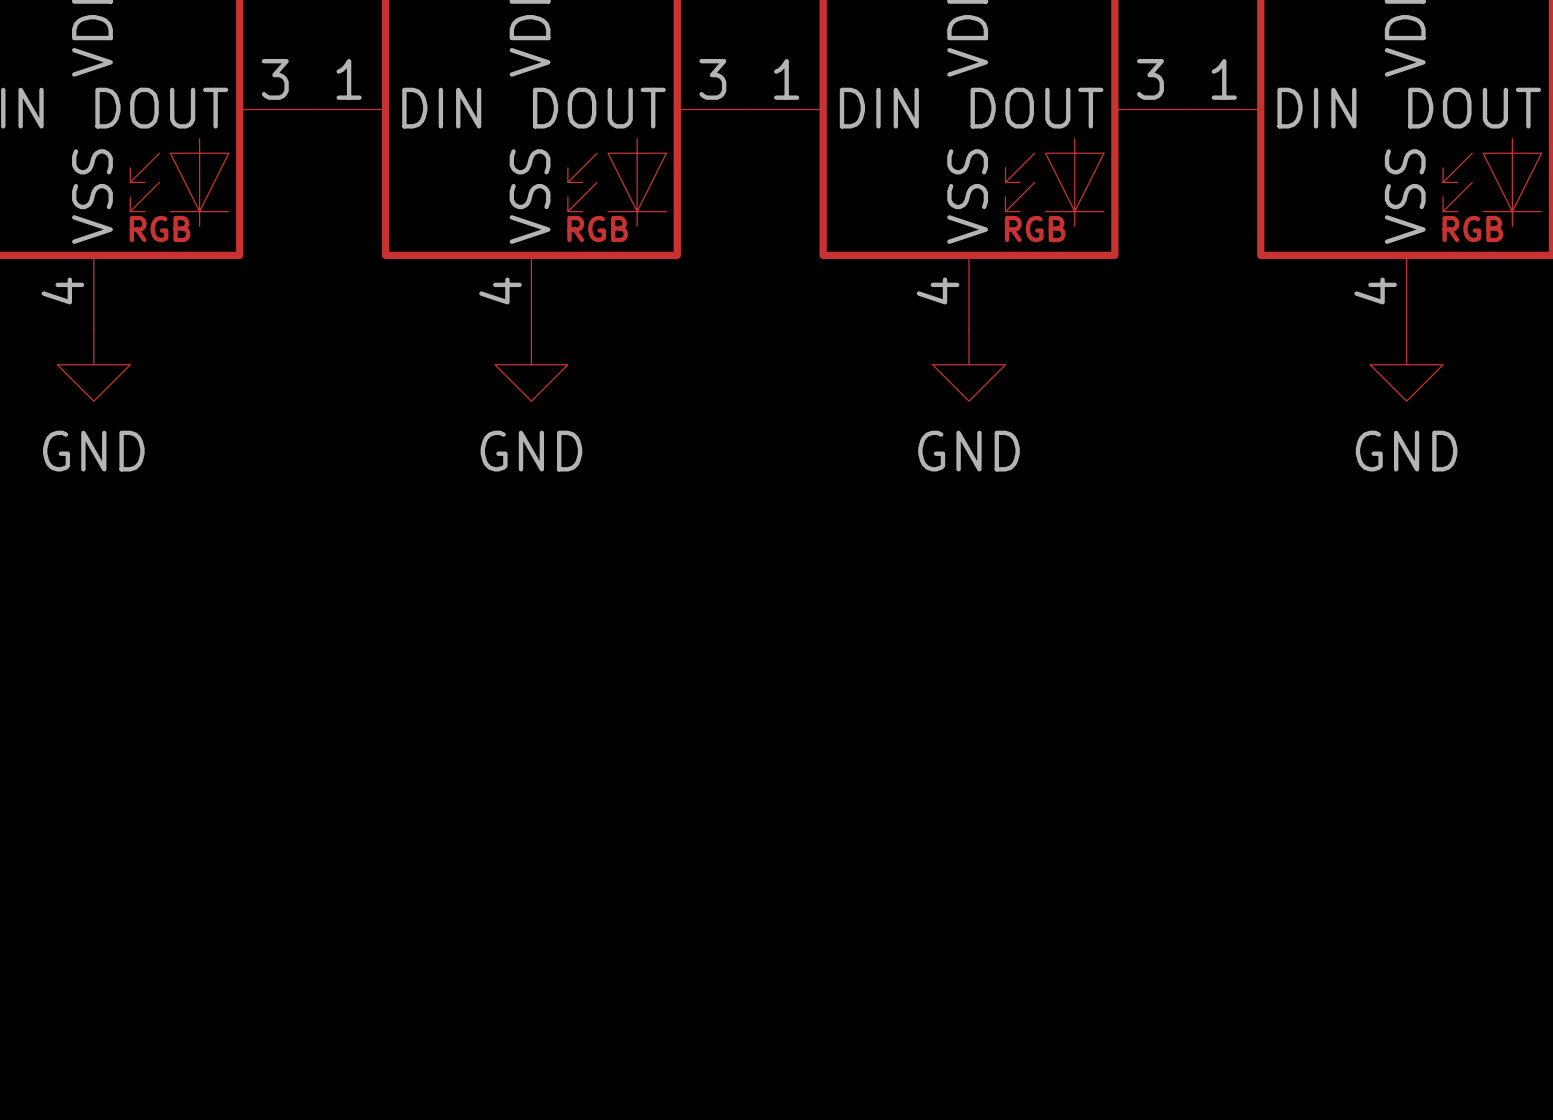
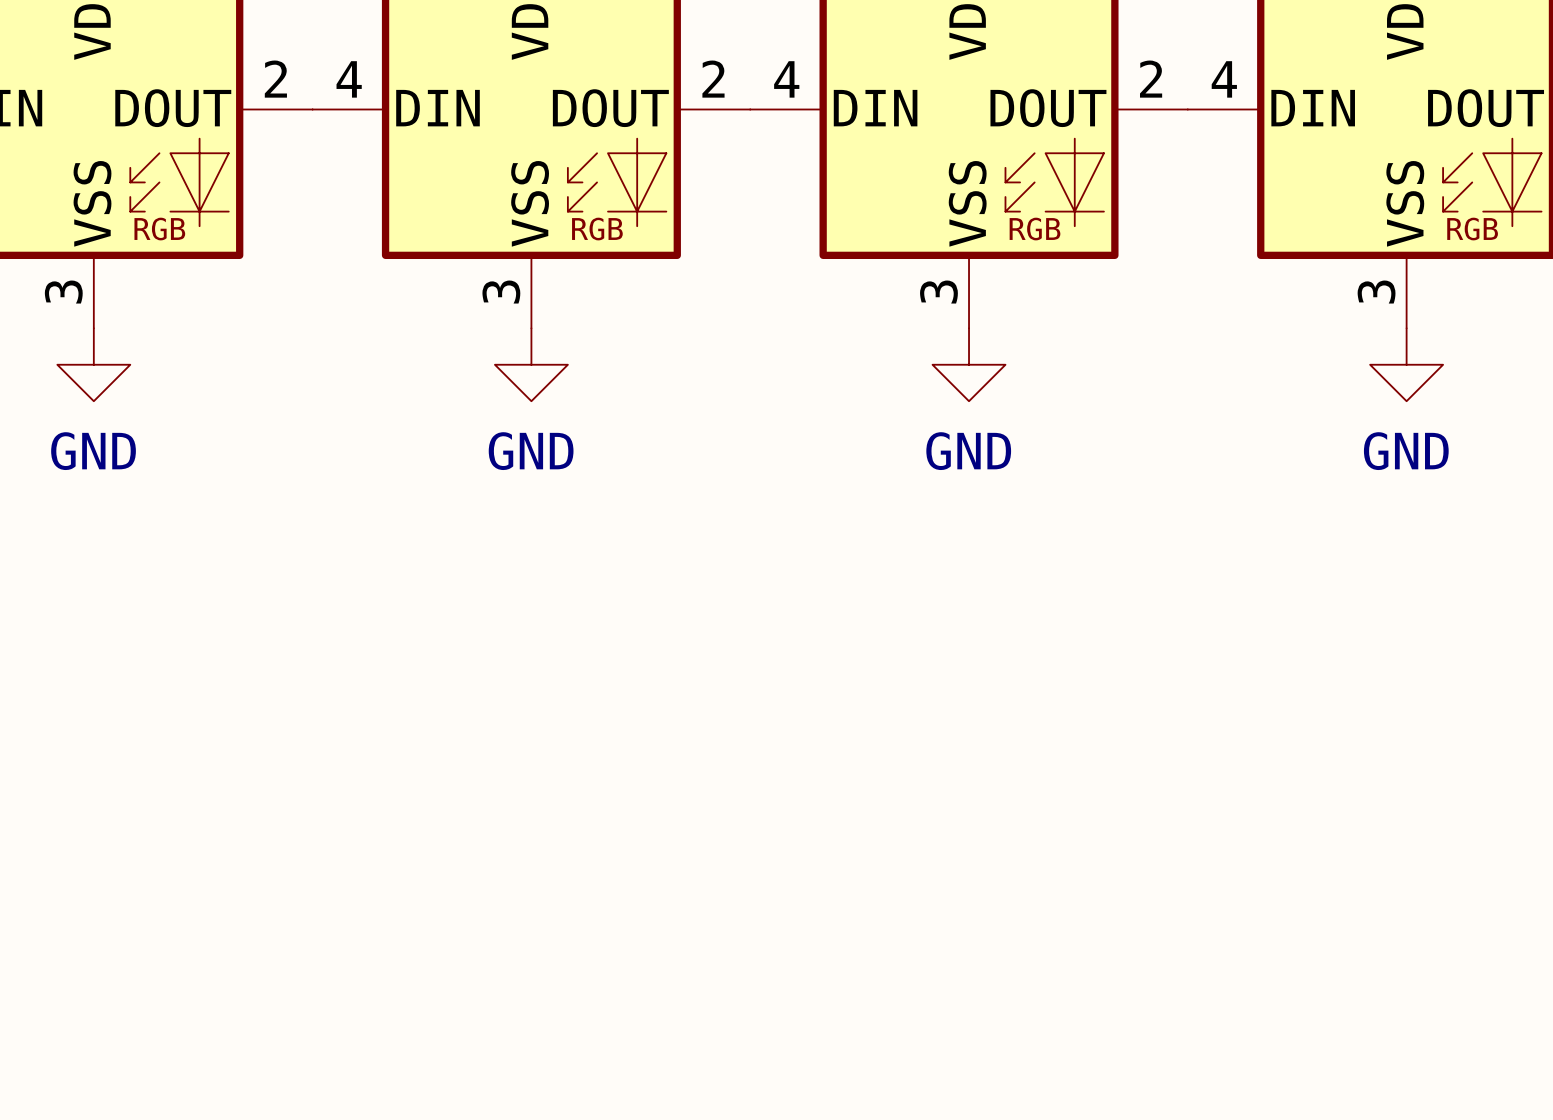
part pin number: 3 (275, 79) -> 2 (275, 79)
part pin number: 1 (349, 79) -> 4 (349, 79)
part pin number: 3 (712, 79) -> 2 (713, 79)
part pin number: 1 (786, 79) -> 4 (786, 79)
part pin number: 3 (1150, 79) -> 2 (1151, 79)
part pin number: 1 (1224, 79) -> 4 (1224, 79)
part pin number: 4 (62, 290) -> 3 (63, 292)
part pin number: 4 (500, 290) -> 3 (501, 292)
part pin number: 4 (938, 290) -> 3 (938, 292)
part pin number: 4 (1375, 290) -> 3 (1376, 292)

